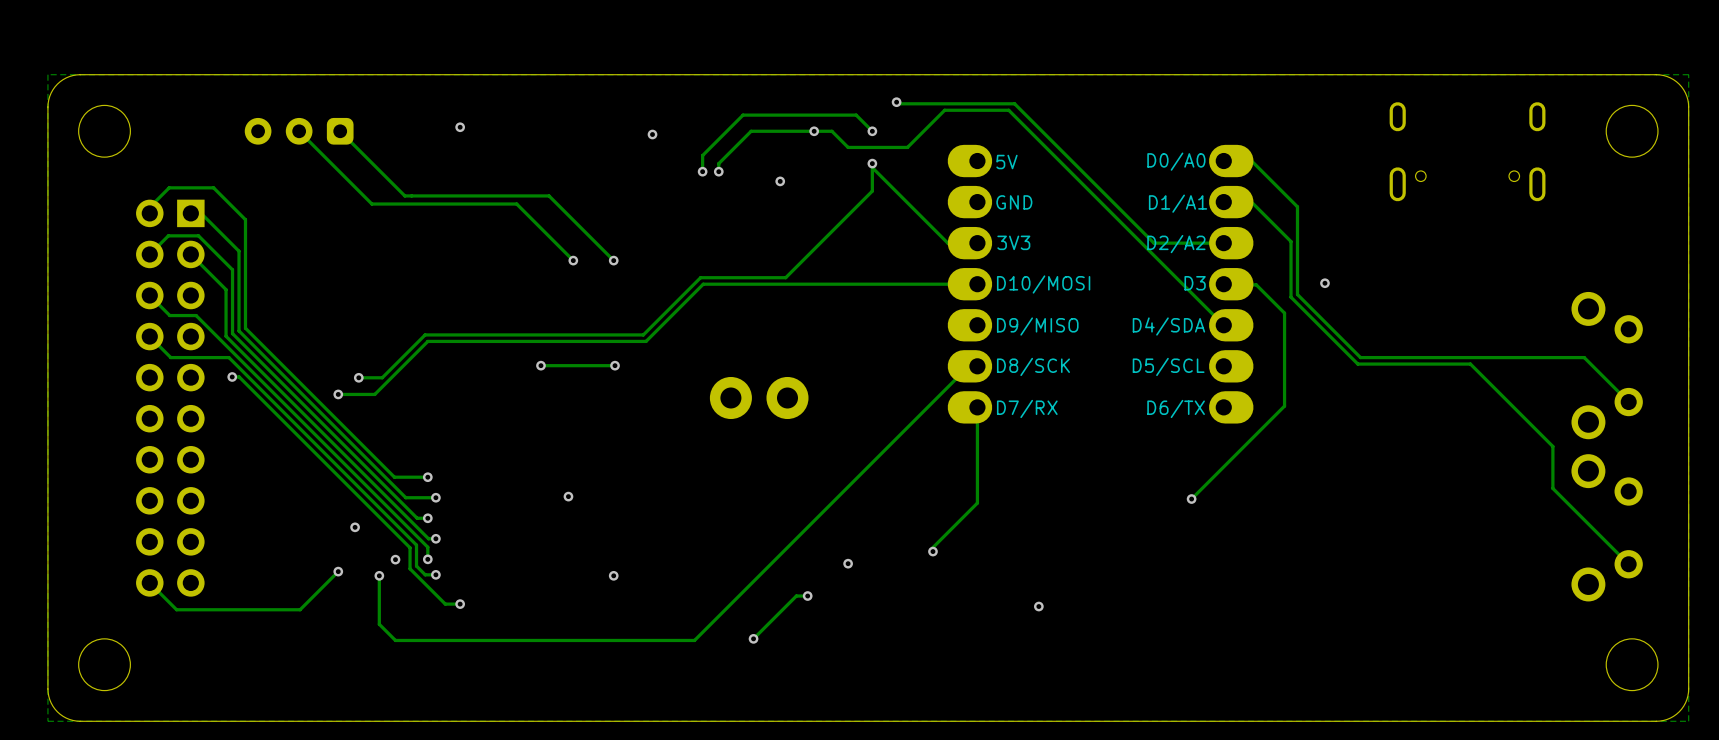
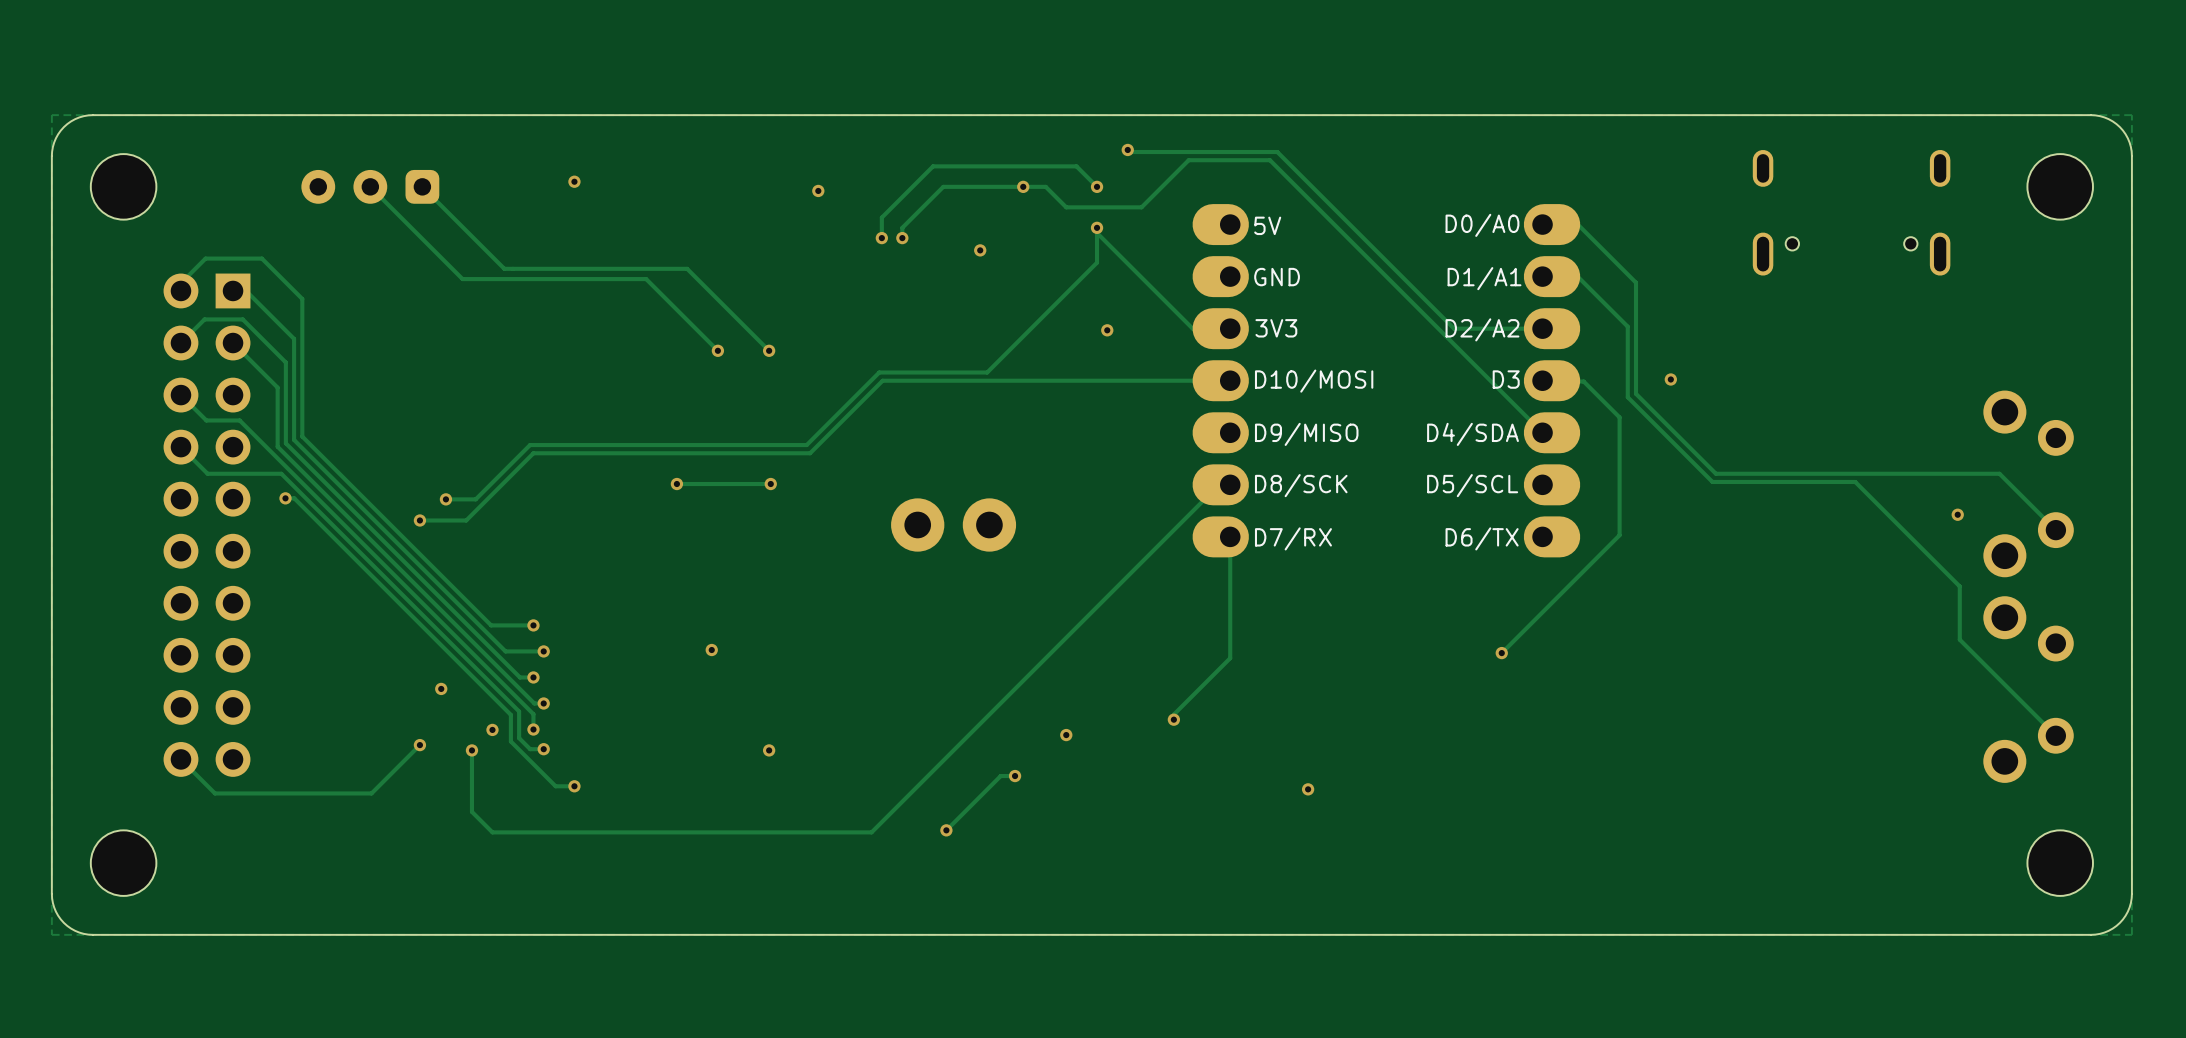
via: none -> (1107, 330)
via: none -> (1957, 514)

